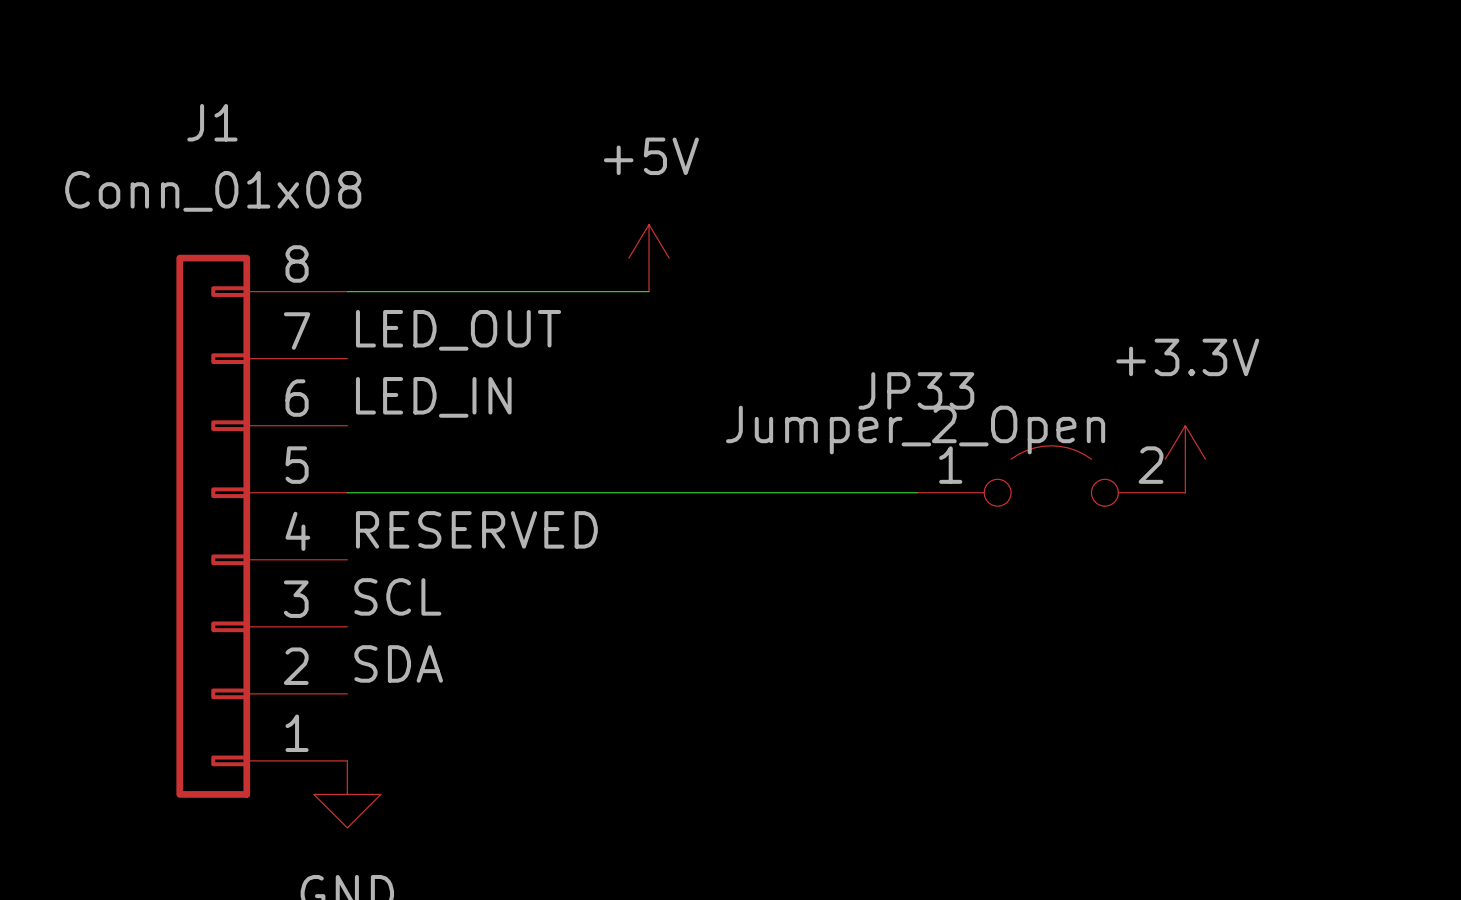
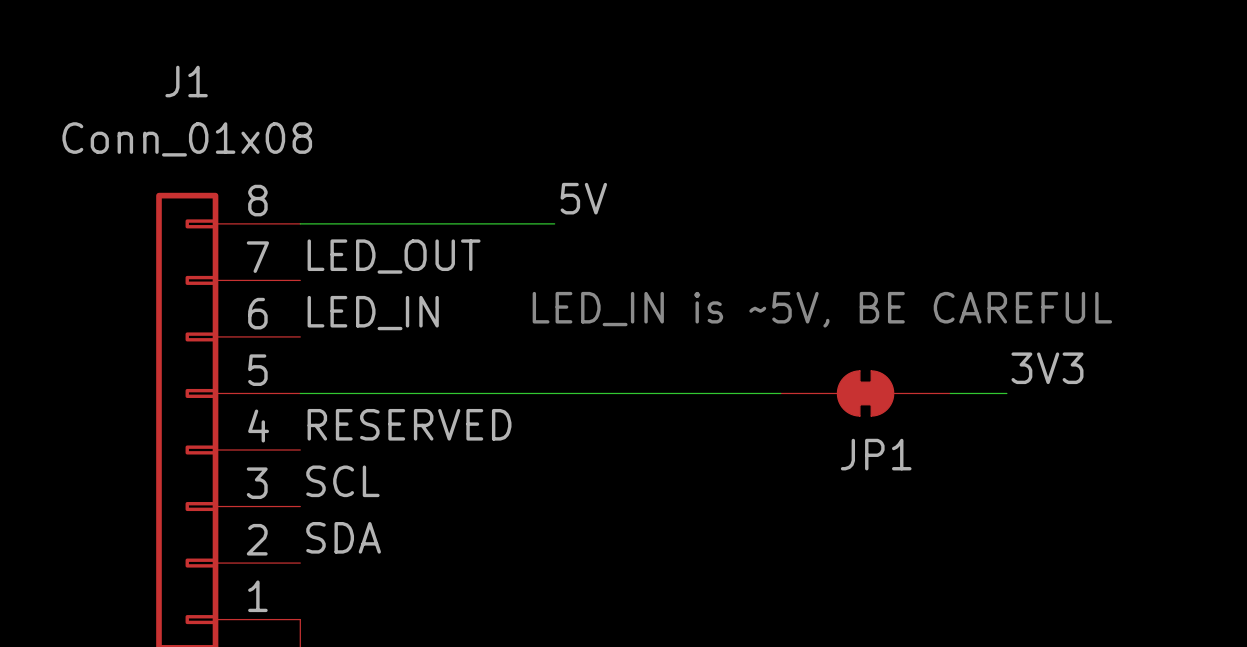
power symbol: +5V (649, 258) -> none
label: none -> 5V (583, 198)
text: none -> LED_IN is ~5V, BE CAREFUL (822, 309)
power symbol: +3.3V (1185, 459) -> none
label: none -> 3V3 (1047, 368)
JP33: Jumper_2_Open (1051, 475) -> none
JP1: none -> (865, 393)

